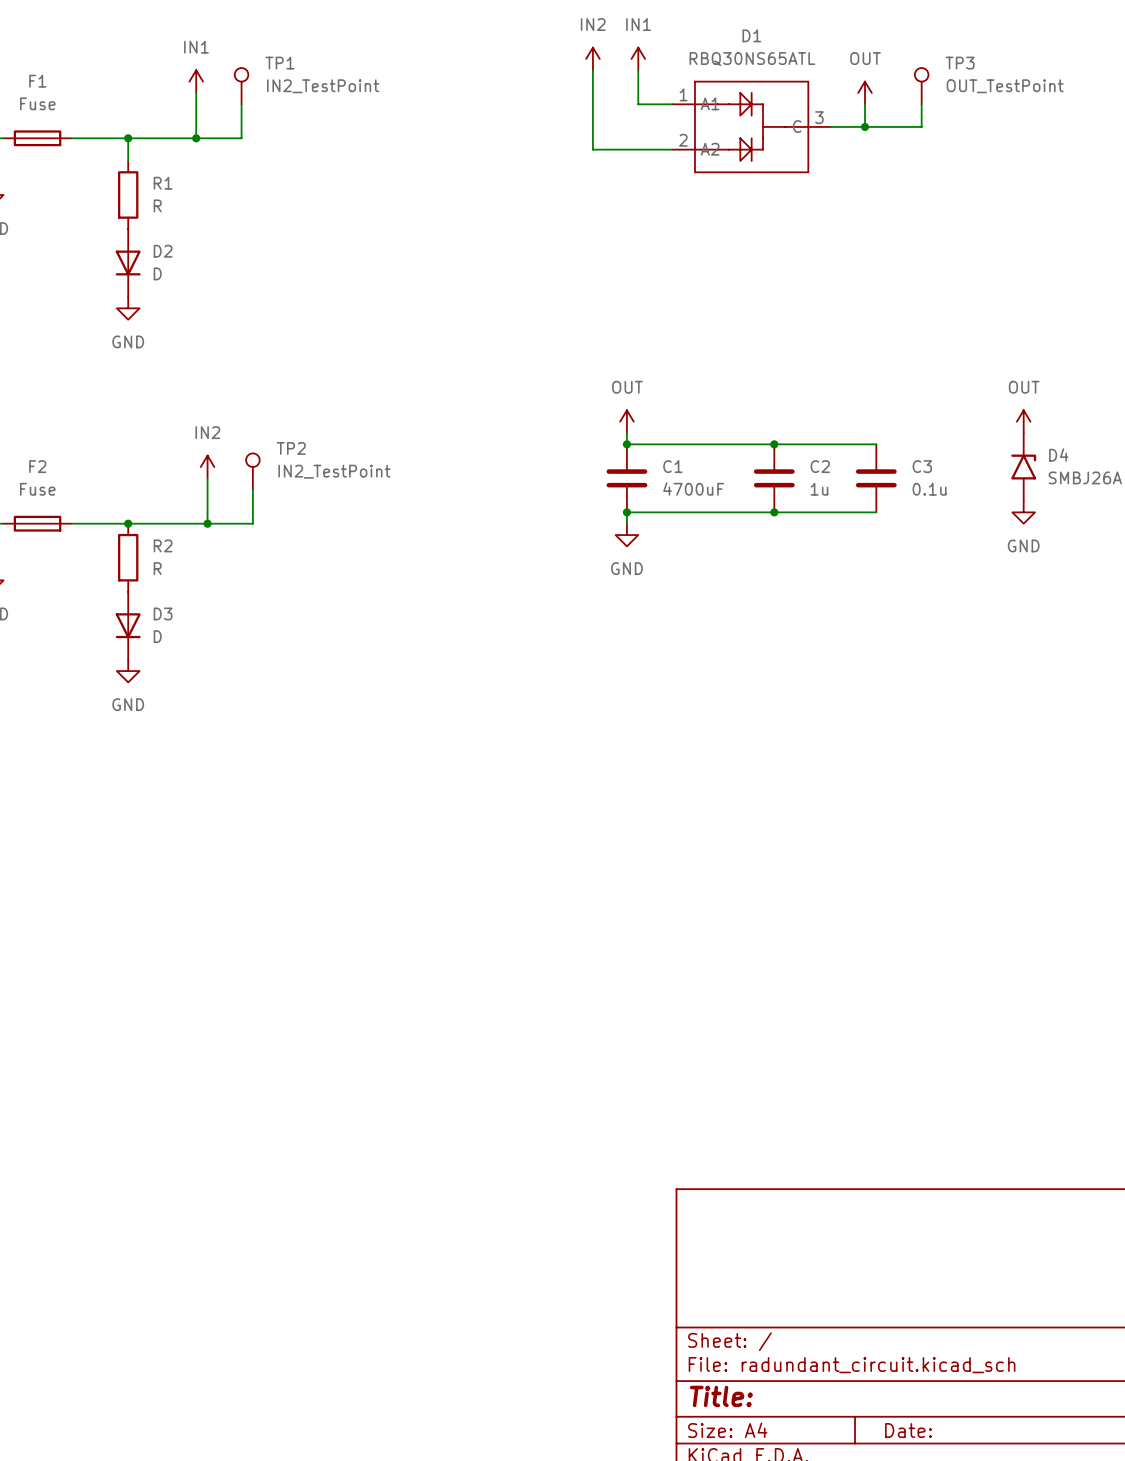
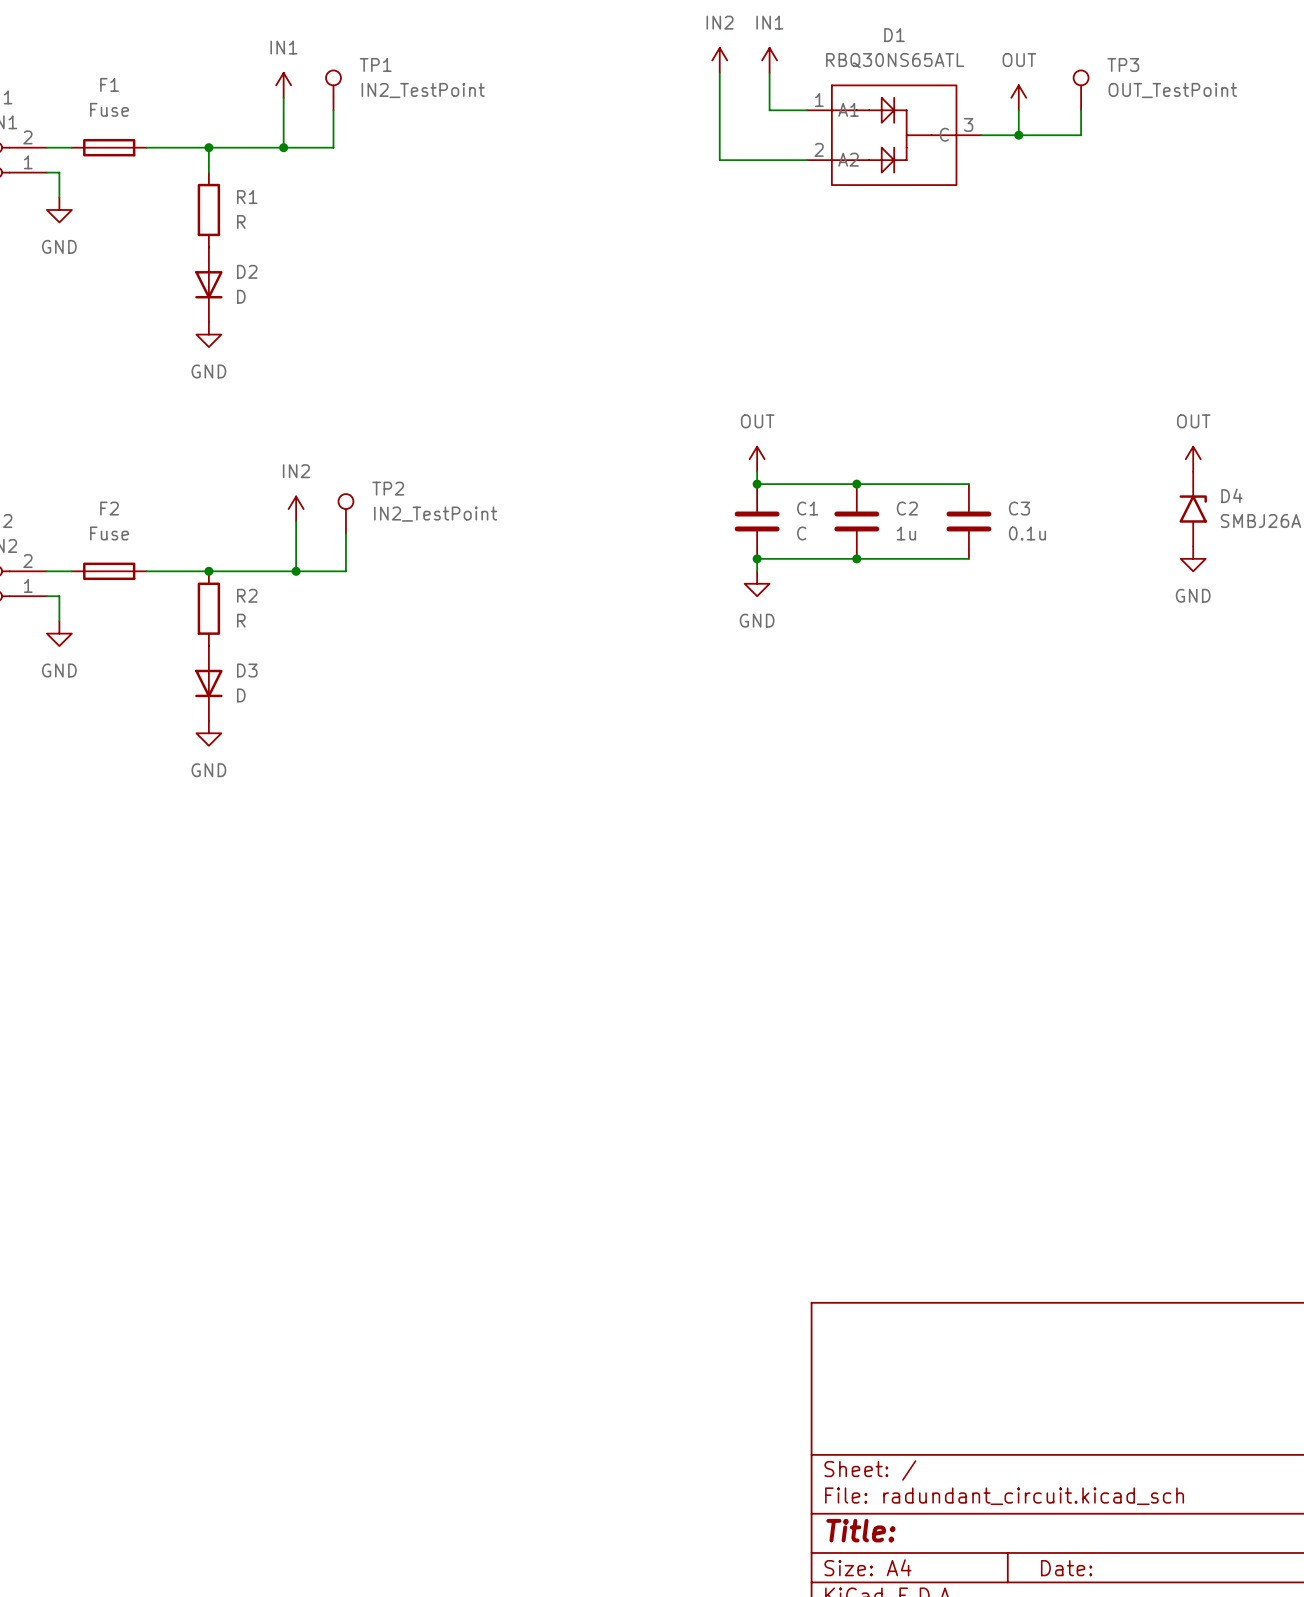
junction: none -> (856, 484)
junction: (774, 444) -> none
wire: (819, 444) (876, 444) -> none
C2 position: (774, 478) -> (856, 521)
C3 position: (876, 478) -> (968, 521)
C1 value: 4700uF (693, 489) -> C (801, 533)
junction: none -> (856, 558)
junction: (774, 512) -> none
wire: (819, 512) (876, 512) -> none

